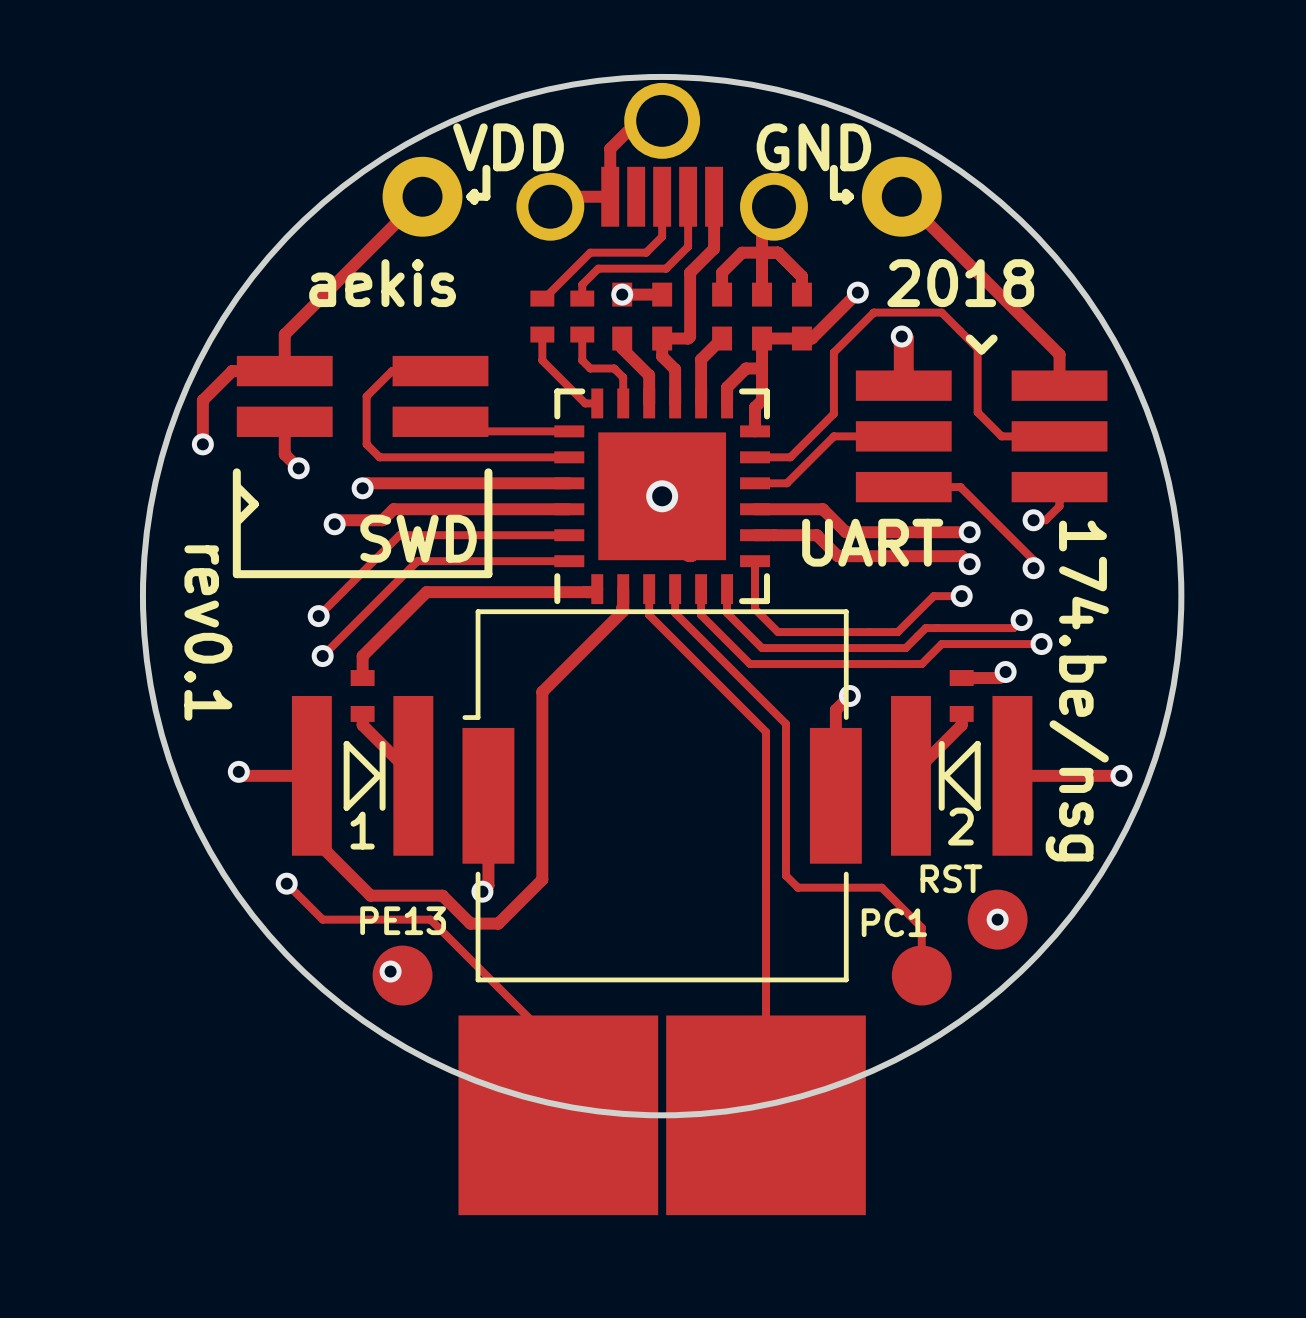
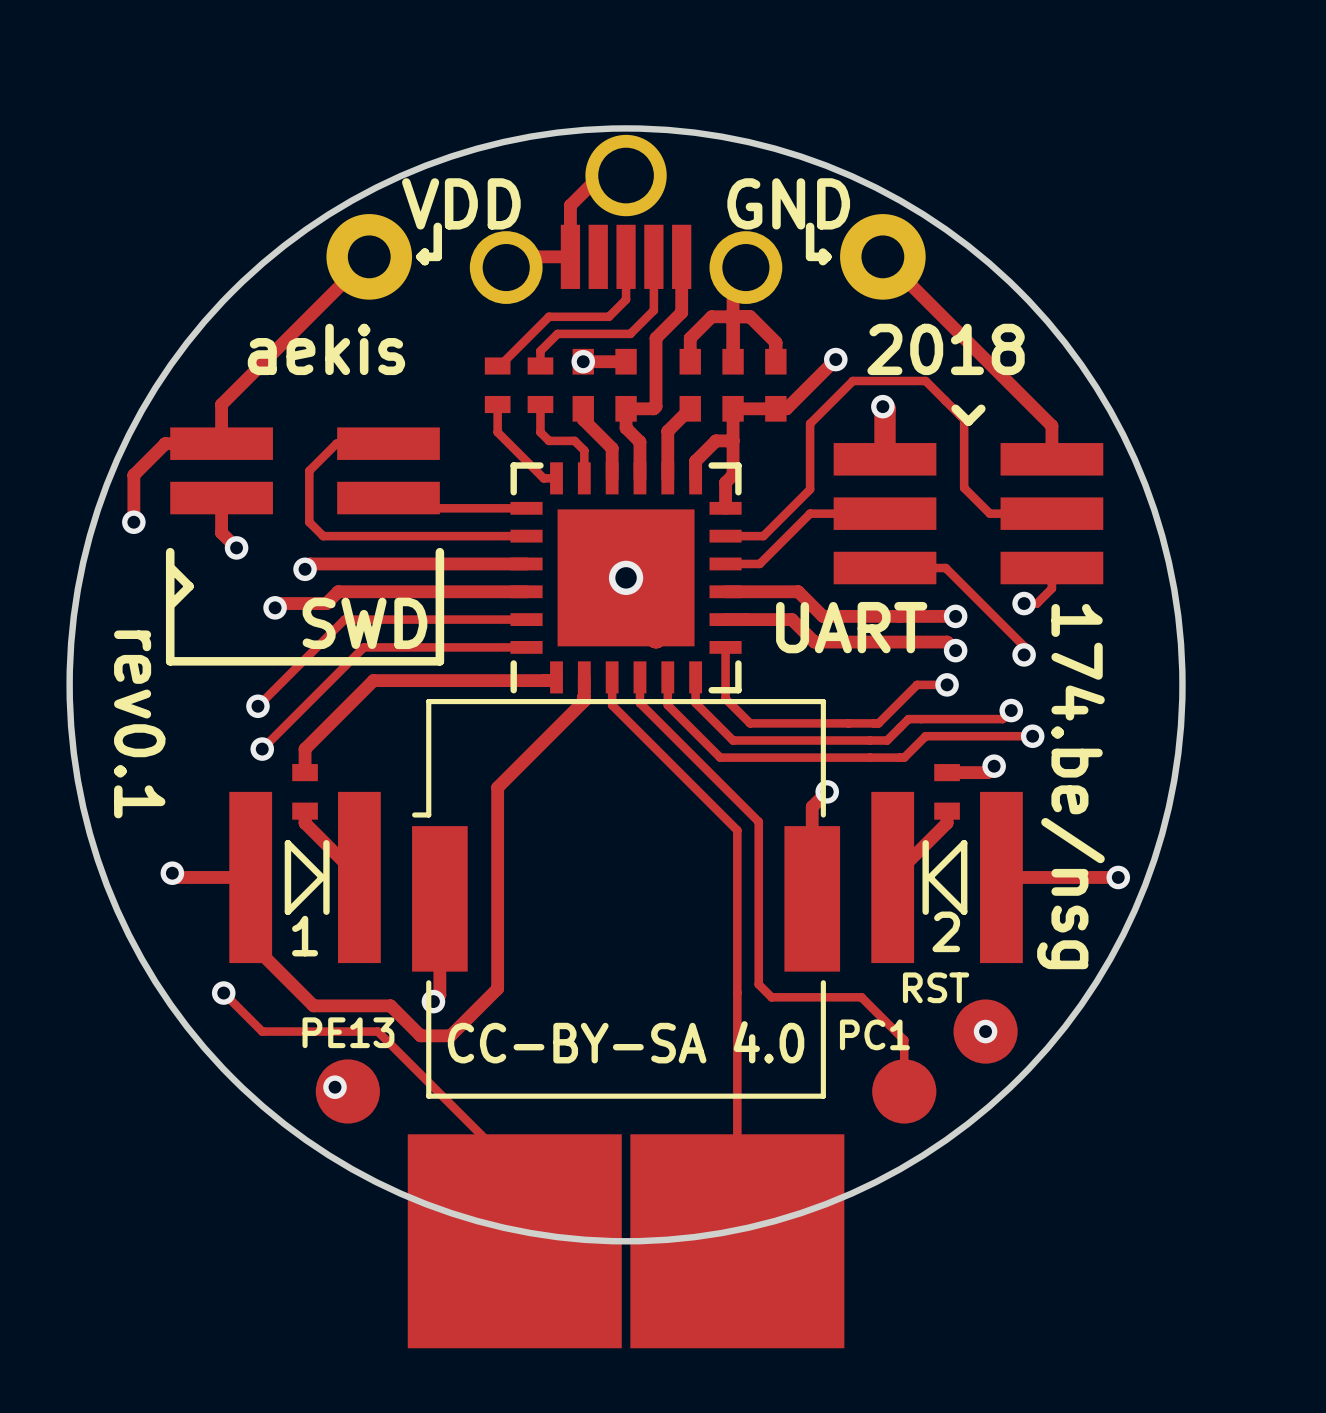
text: none -> CC-BY-SA 4.0 (626, 1042)

